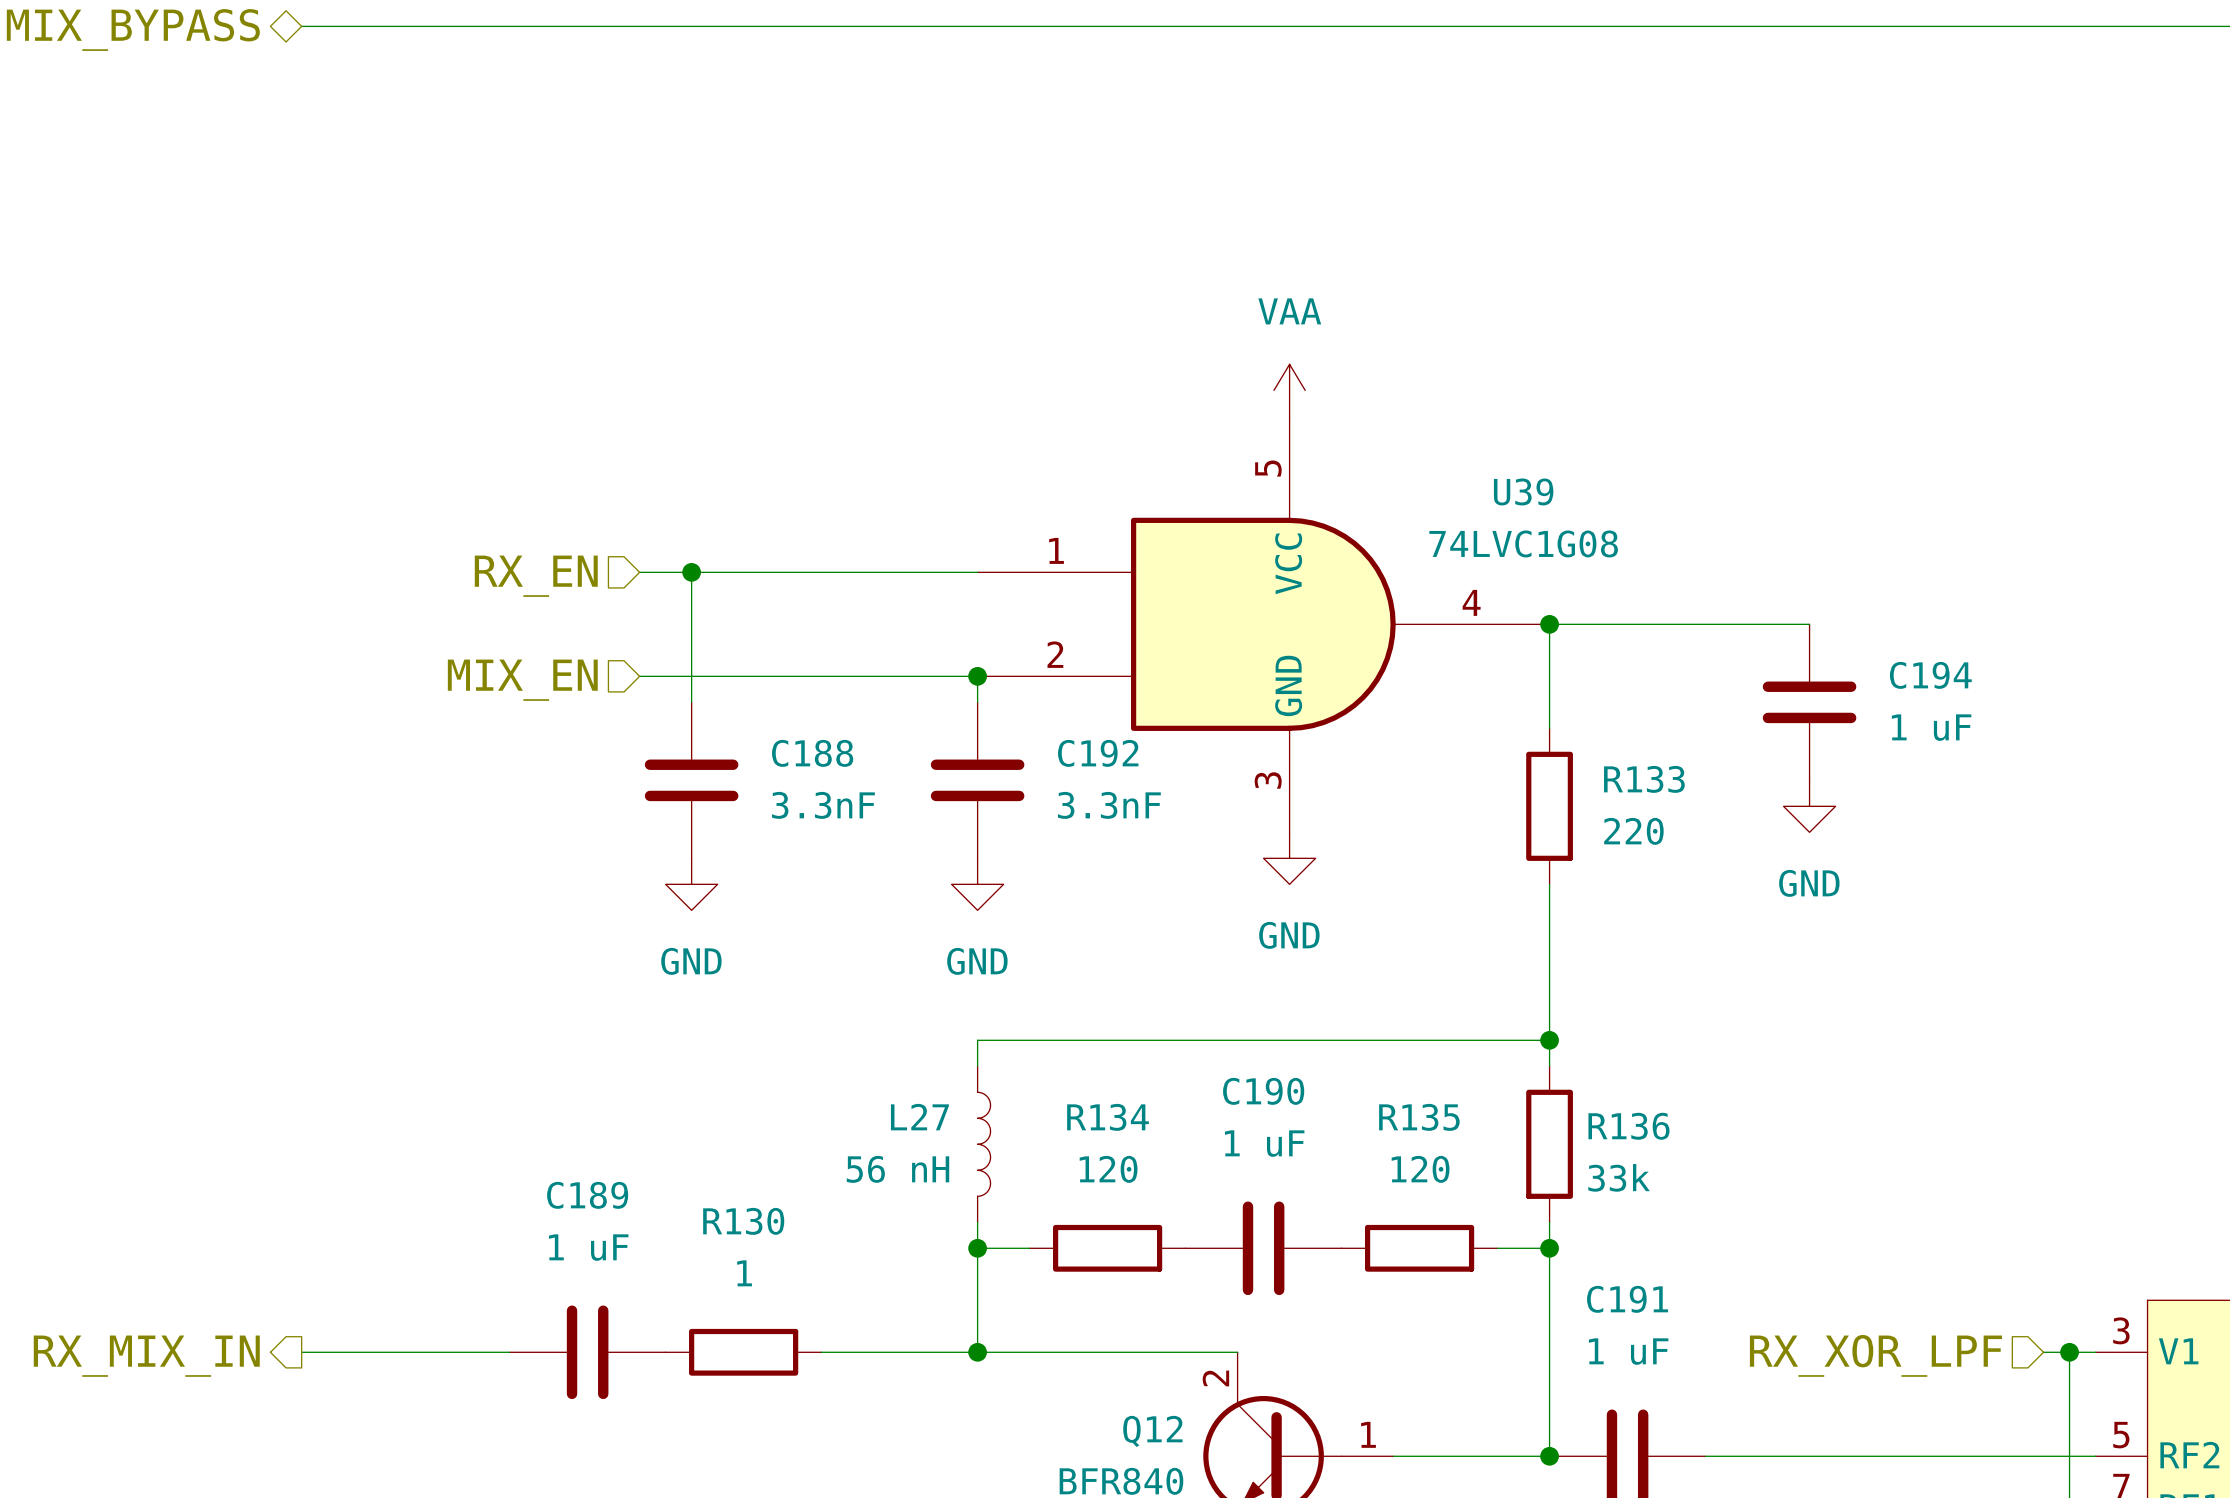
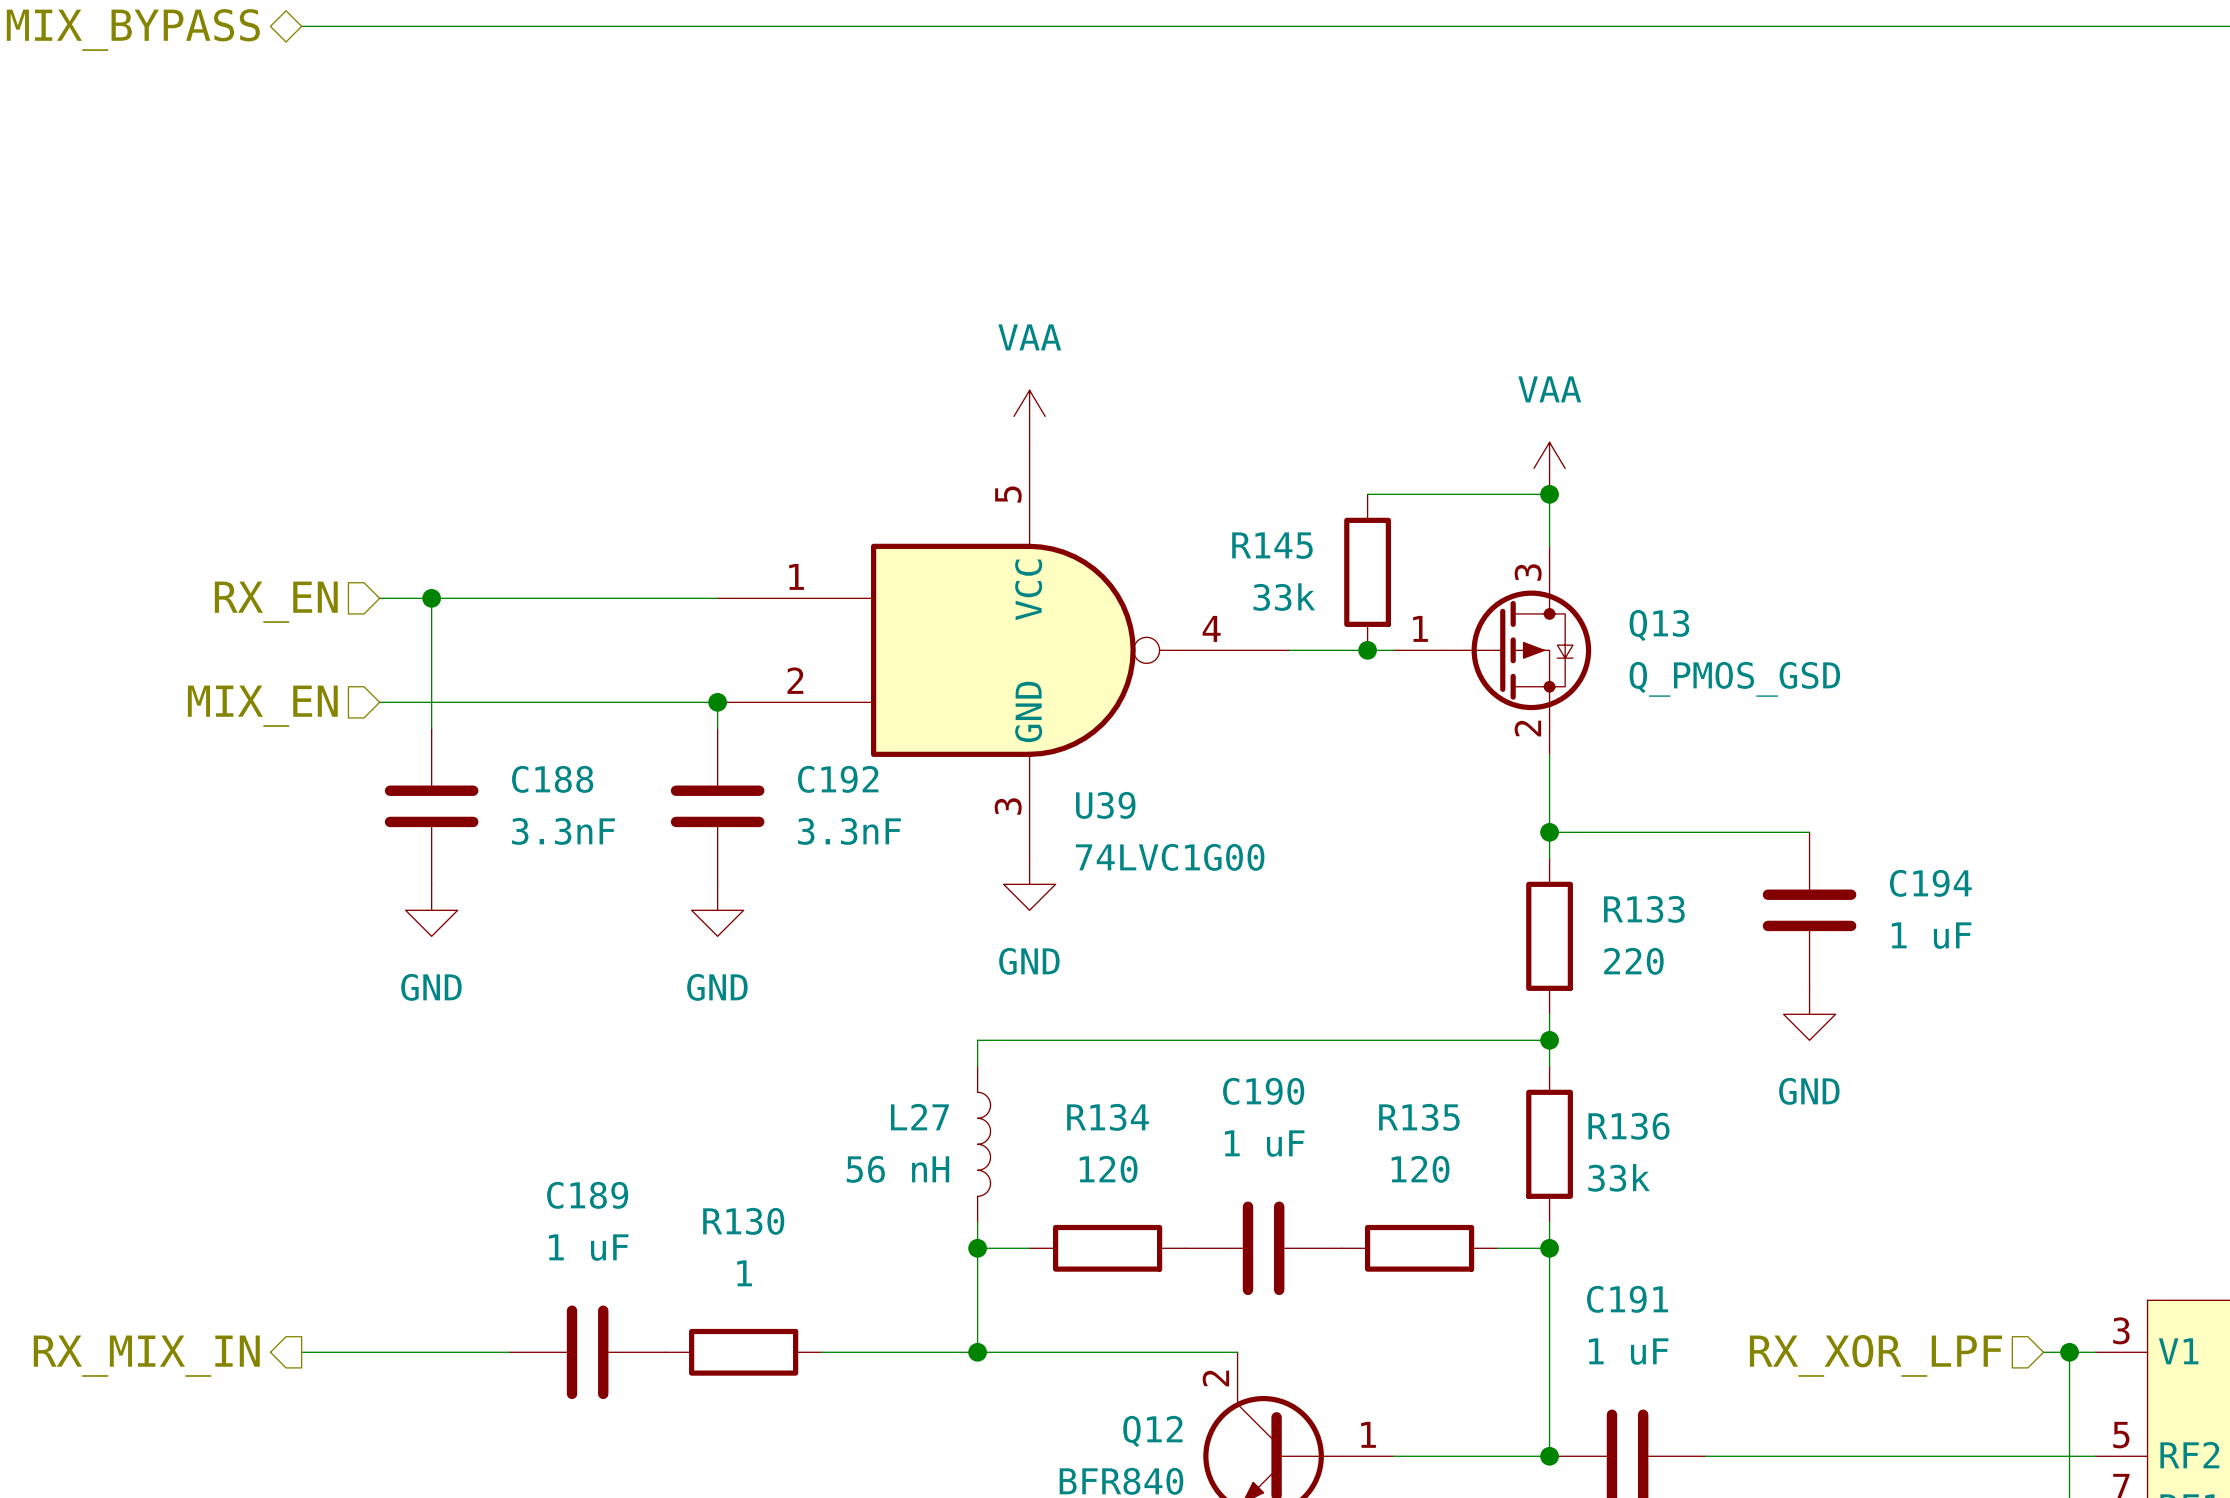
power symbol: VAA (1289, 390) -> none
U39 symbol: [977, 416, 1550, 833] -> [717, 442, 1290, 859]
power symbol: none -> VAA (1029, 416)
power symbol: none -> VAA (1549, 468)
U39 name position: U39 (1523, 491) -> U39 (1105, 805)
wire: none -> (1367, 494) (1549, 494) (1549, 546)
junction: none -> (1549, 494)
U39 value: 74LVC1G08 (1523, 543) -> 74LVC1G00 (1170, 857)
wire: (639, 572) (977, 572) -> (379, 598) (717, 598)
wire: (691, 572) (691, 702) -> (431, 598) (431, 728)
junction: (691, 572) -> none
R145: none -> 33k (1367, 572)
hierarchical label position: RX_EN (536, 576) -> RX_EN (276, 602)
junction: none -> (431, 598)
junction: (1549, 624) -> none
wire: (1809, 624) (1549, 624) (1549, 728) -> none
junction: none -> (1367, 650)
Q13: none -> Q_PMOS_GSD (1492, 650)
wire: (639, 676) (977, 676) (977, 702) -> (379, 702) (717, 702) (717, 728)
junction: (977, 676) -> none
hierarchical label position: MIX_EN (522, 680) -> MIX_EN (262, 706)
junction: none -> (717, 702)
C194 position: (1809, 702) -> (1809, 910)
wire: none -> (1549, 754) (1549, 858)
C188 position: (691, 780) -> (431, 806)
C192 position: (977, 780) -> (717, 806)
R133 position: (1549, 806) -> (1549, 936)
power symbol position: GND (1809, 806) -> GND (1809, 1014)
wire: none -> (1549, 832) (1809, 832)
junction: none -> (1549, 832)
power symbol: GND (1289, 858) -> none
power symbol position: GND (691, 884) -> GND (717, 910)
power symbol position: GND (977, 884) -> GND (1029, 884)
wire: (1549, 884) (1549, 1014) -> none
power symbol: none -> GND (431, 910)

